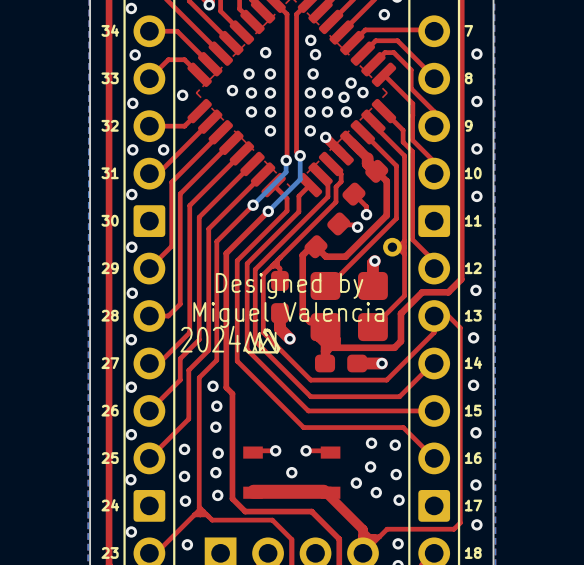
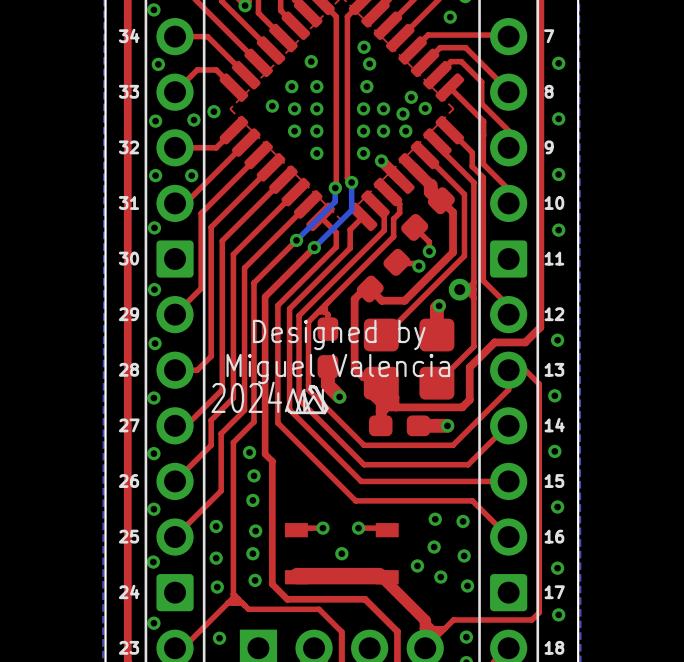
via: none -> (193, 120)

